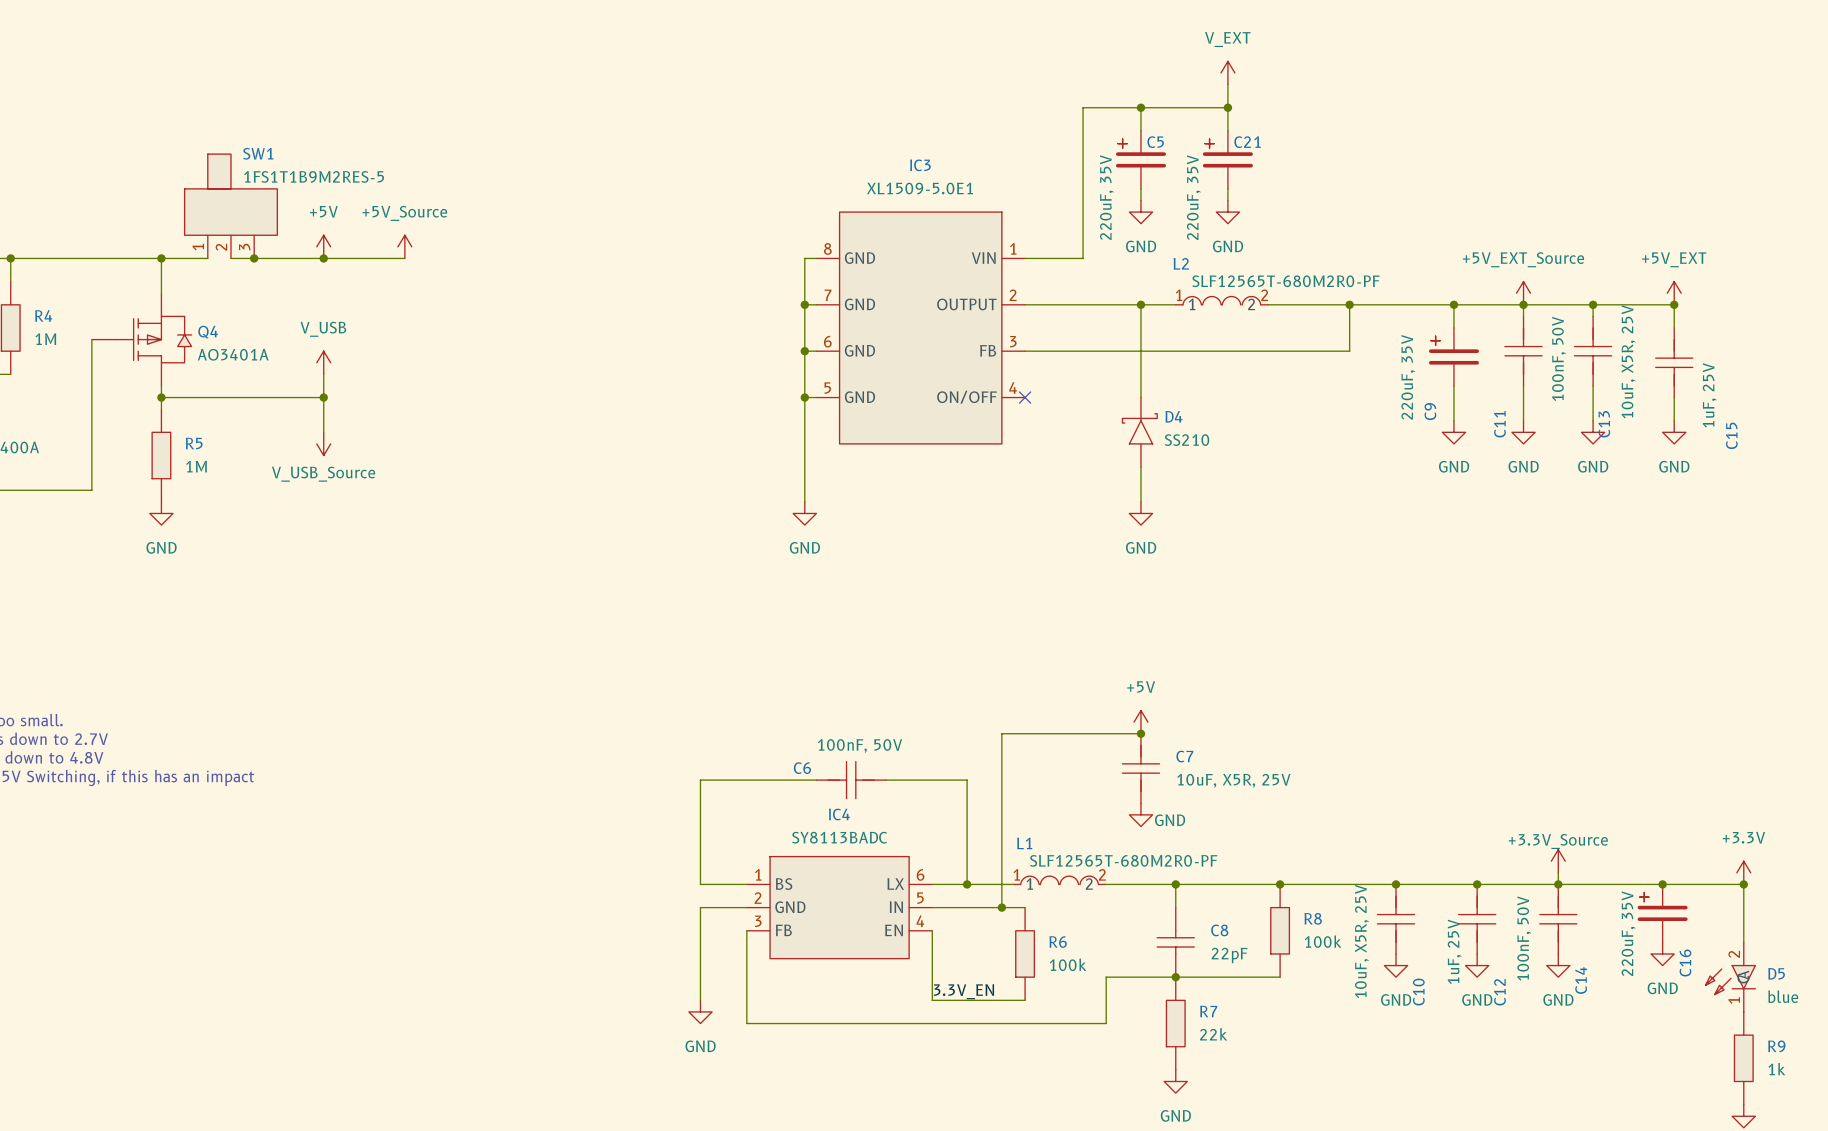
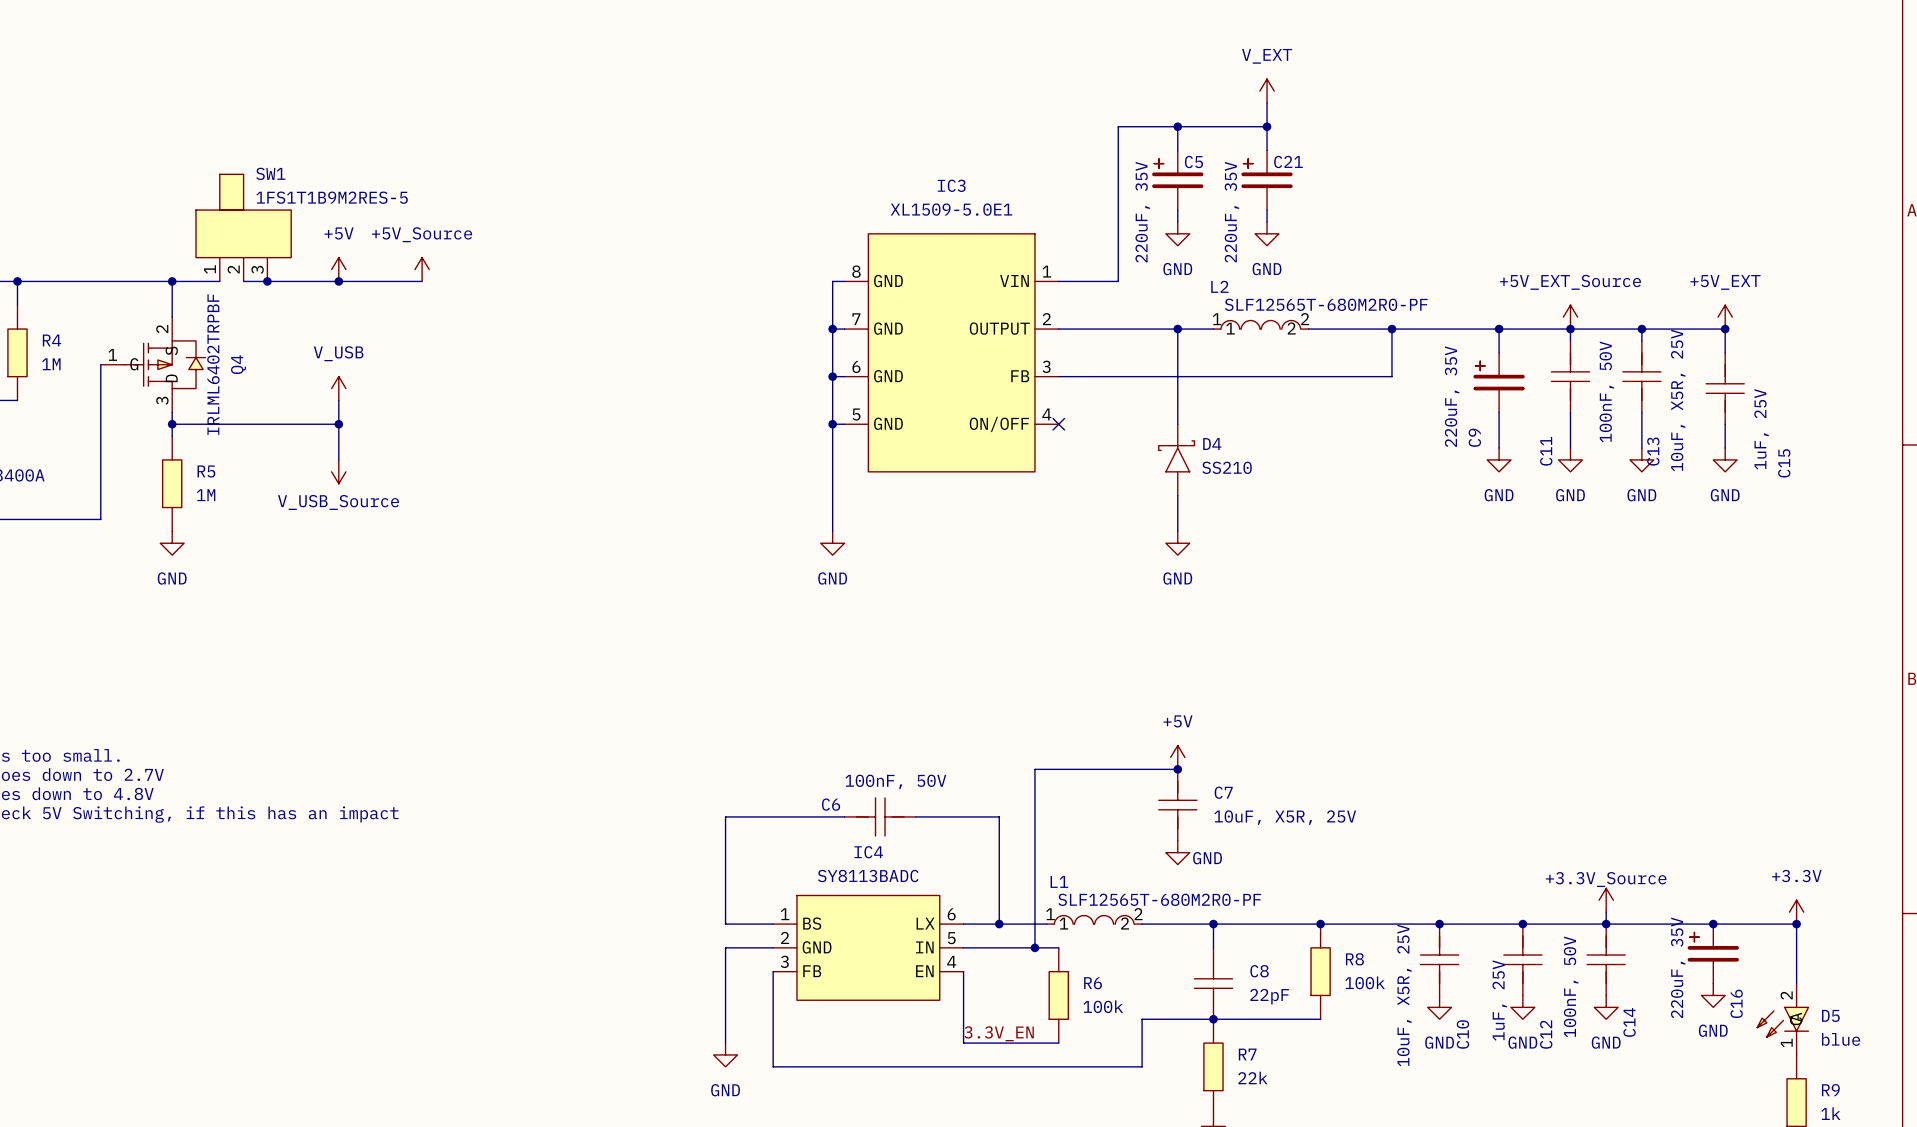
Q4 symbol: [91, 293, 192, 386] -> [100, 317, 206, 413]
Q4 value: AO3401A (233, 354) -> IRLML6402TRPBF (213, 364)

